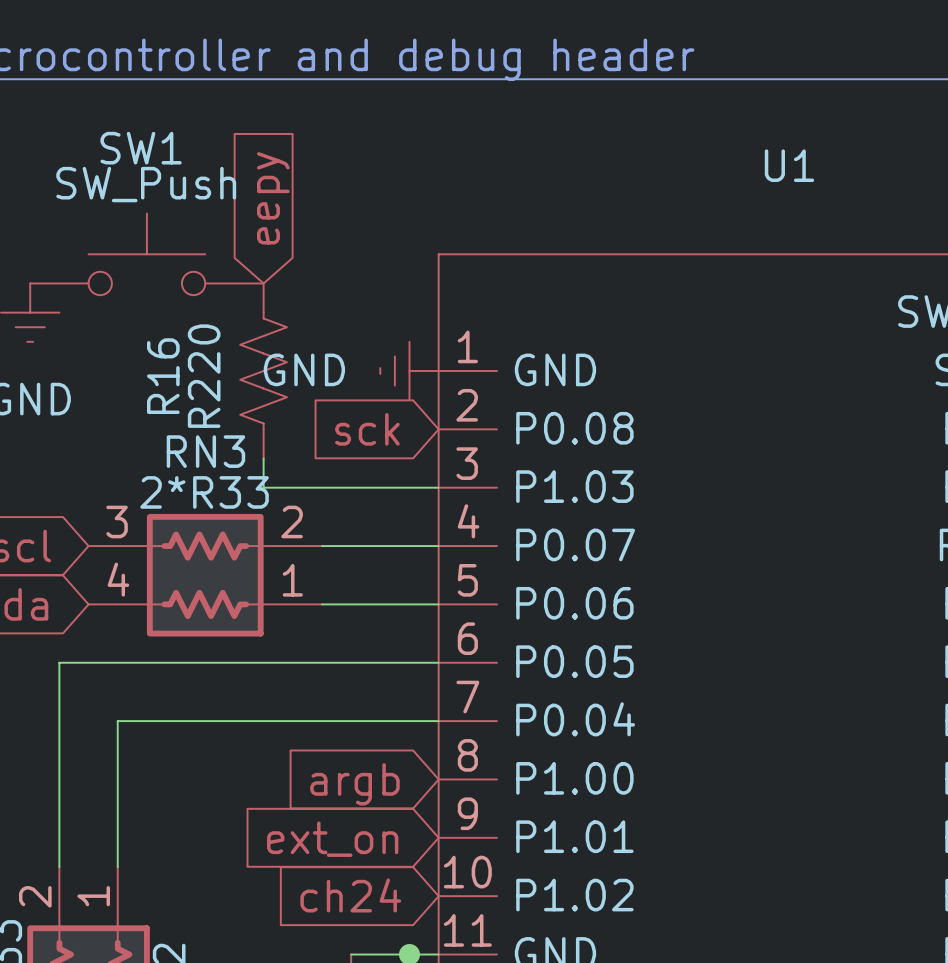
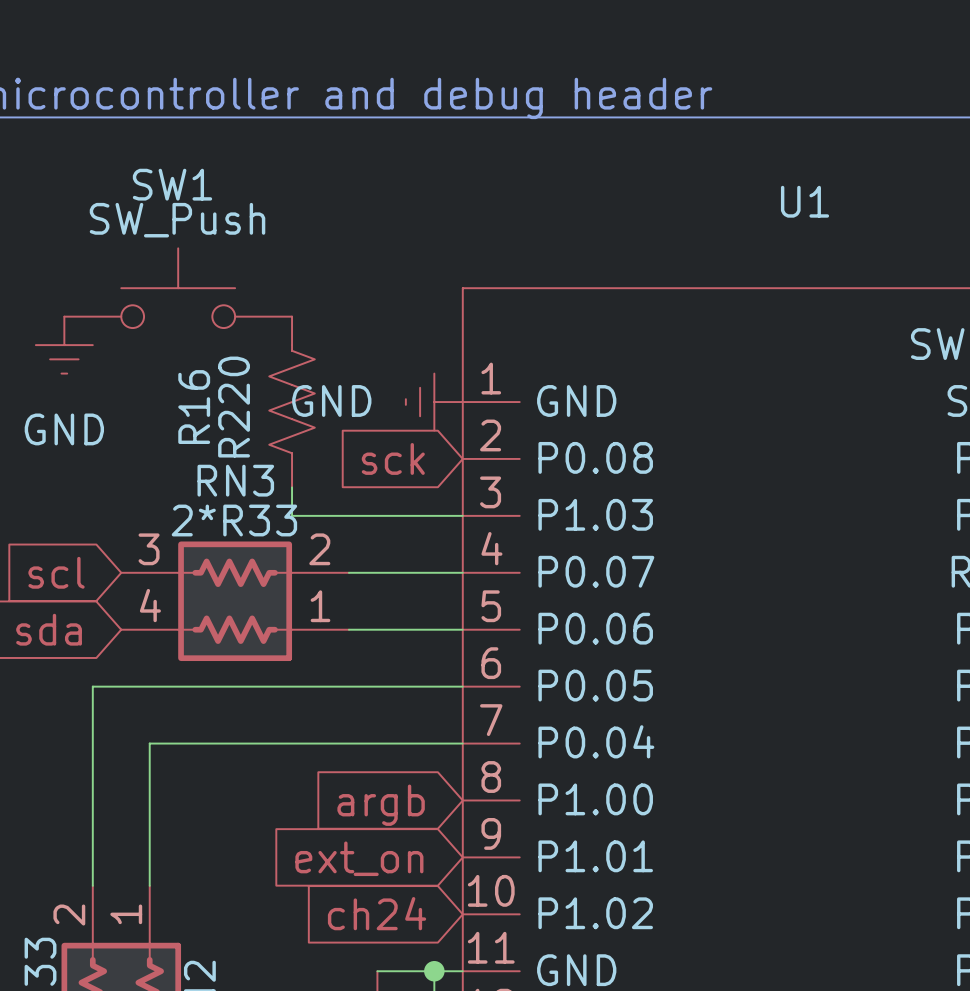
global label: eepy (273, 198) -> none

